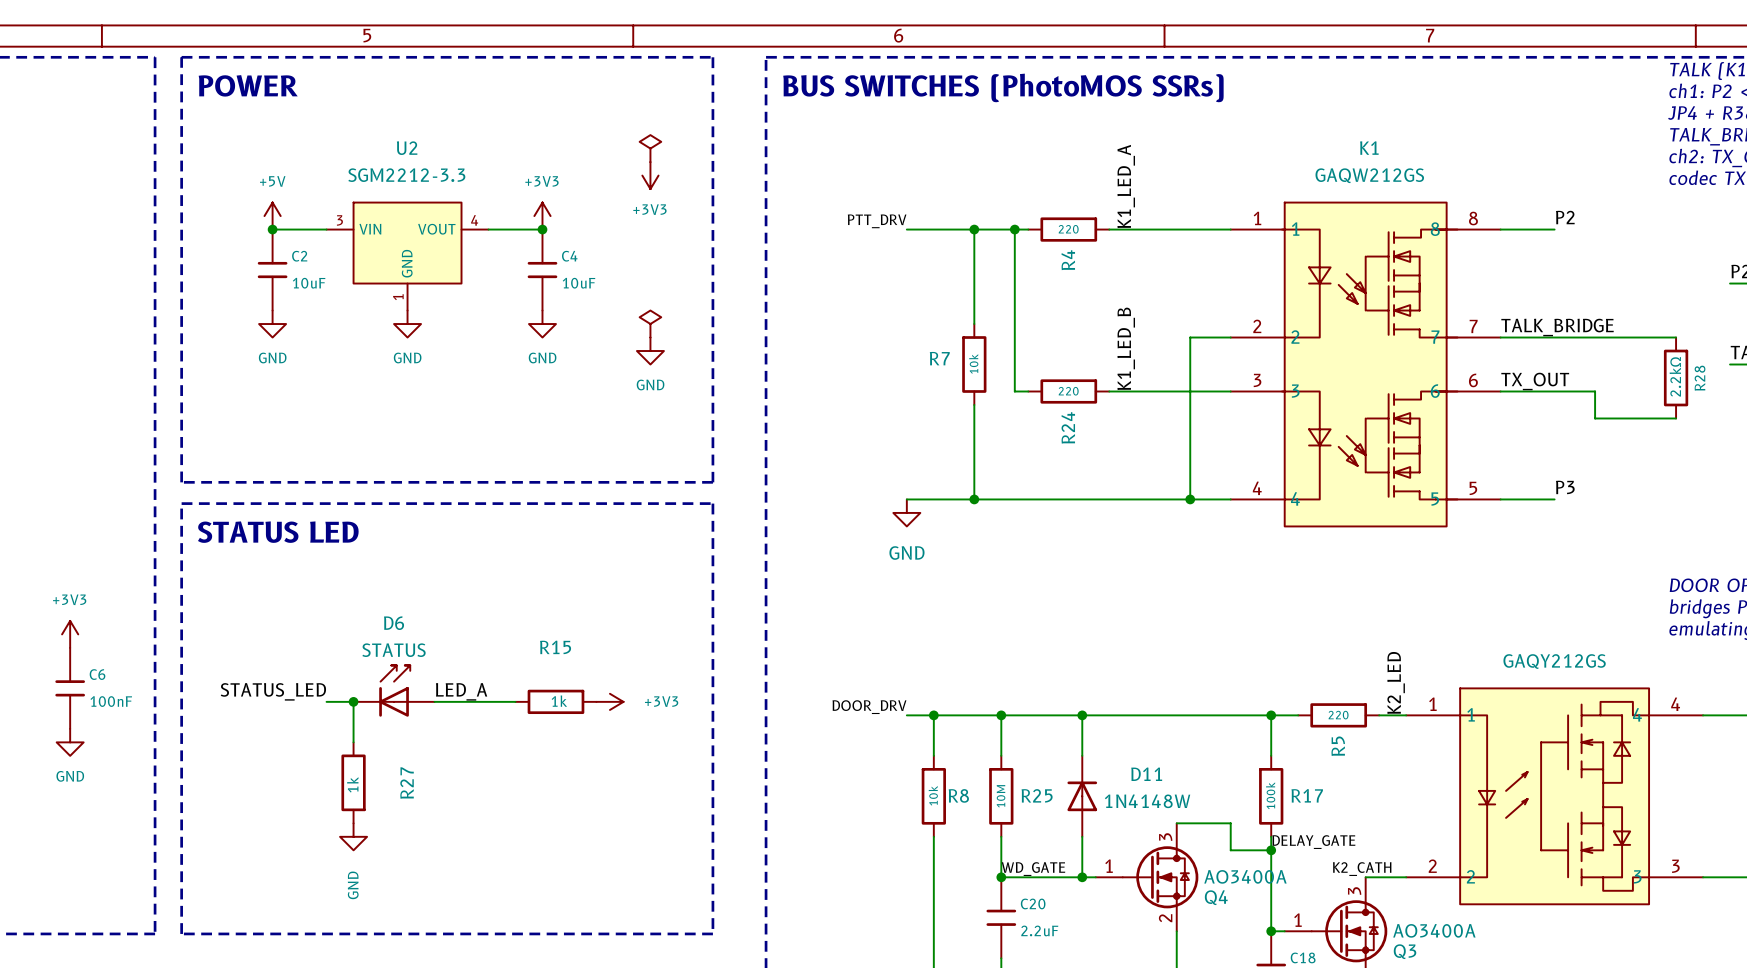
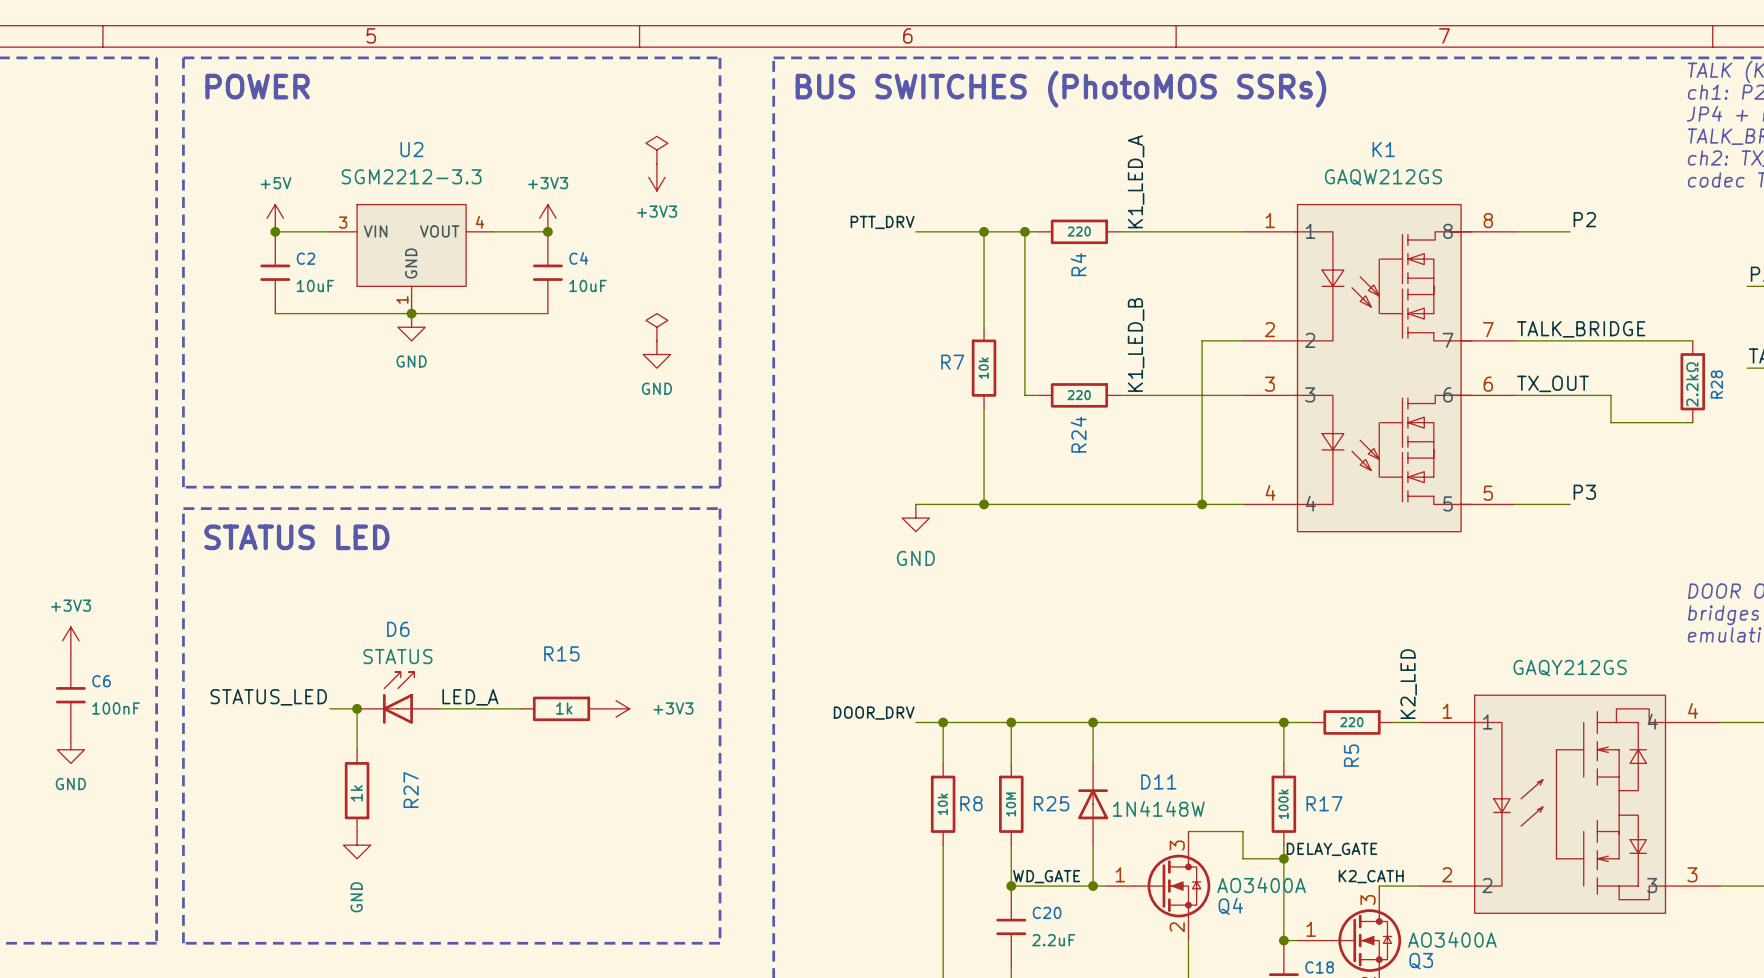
wire: none -> (275, 313) (547, 313)
junction: none -> (411, 313)
power symbol: GND (272, 324) -> none
power symbol: GND (542, 324) -> none

